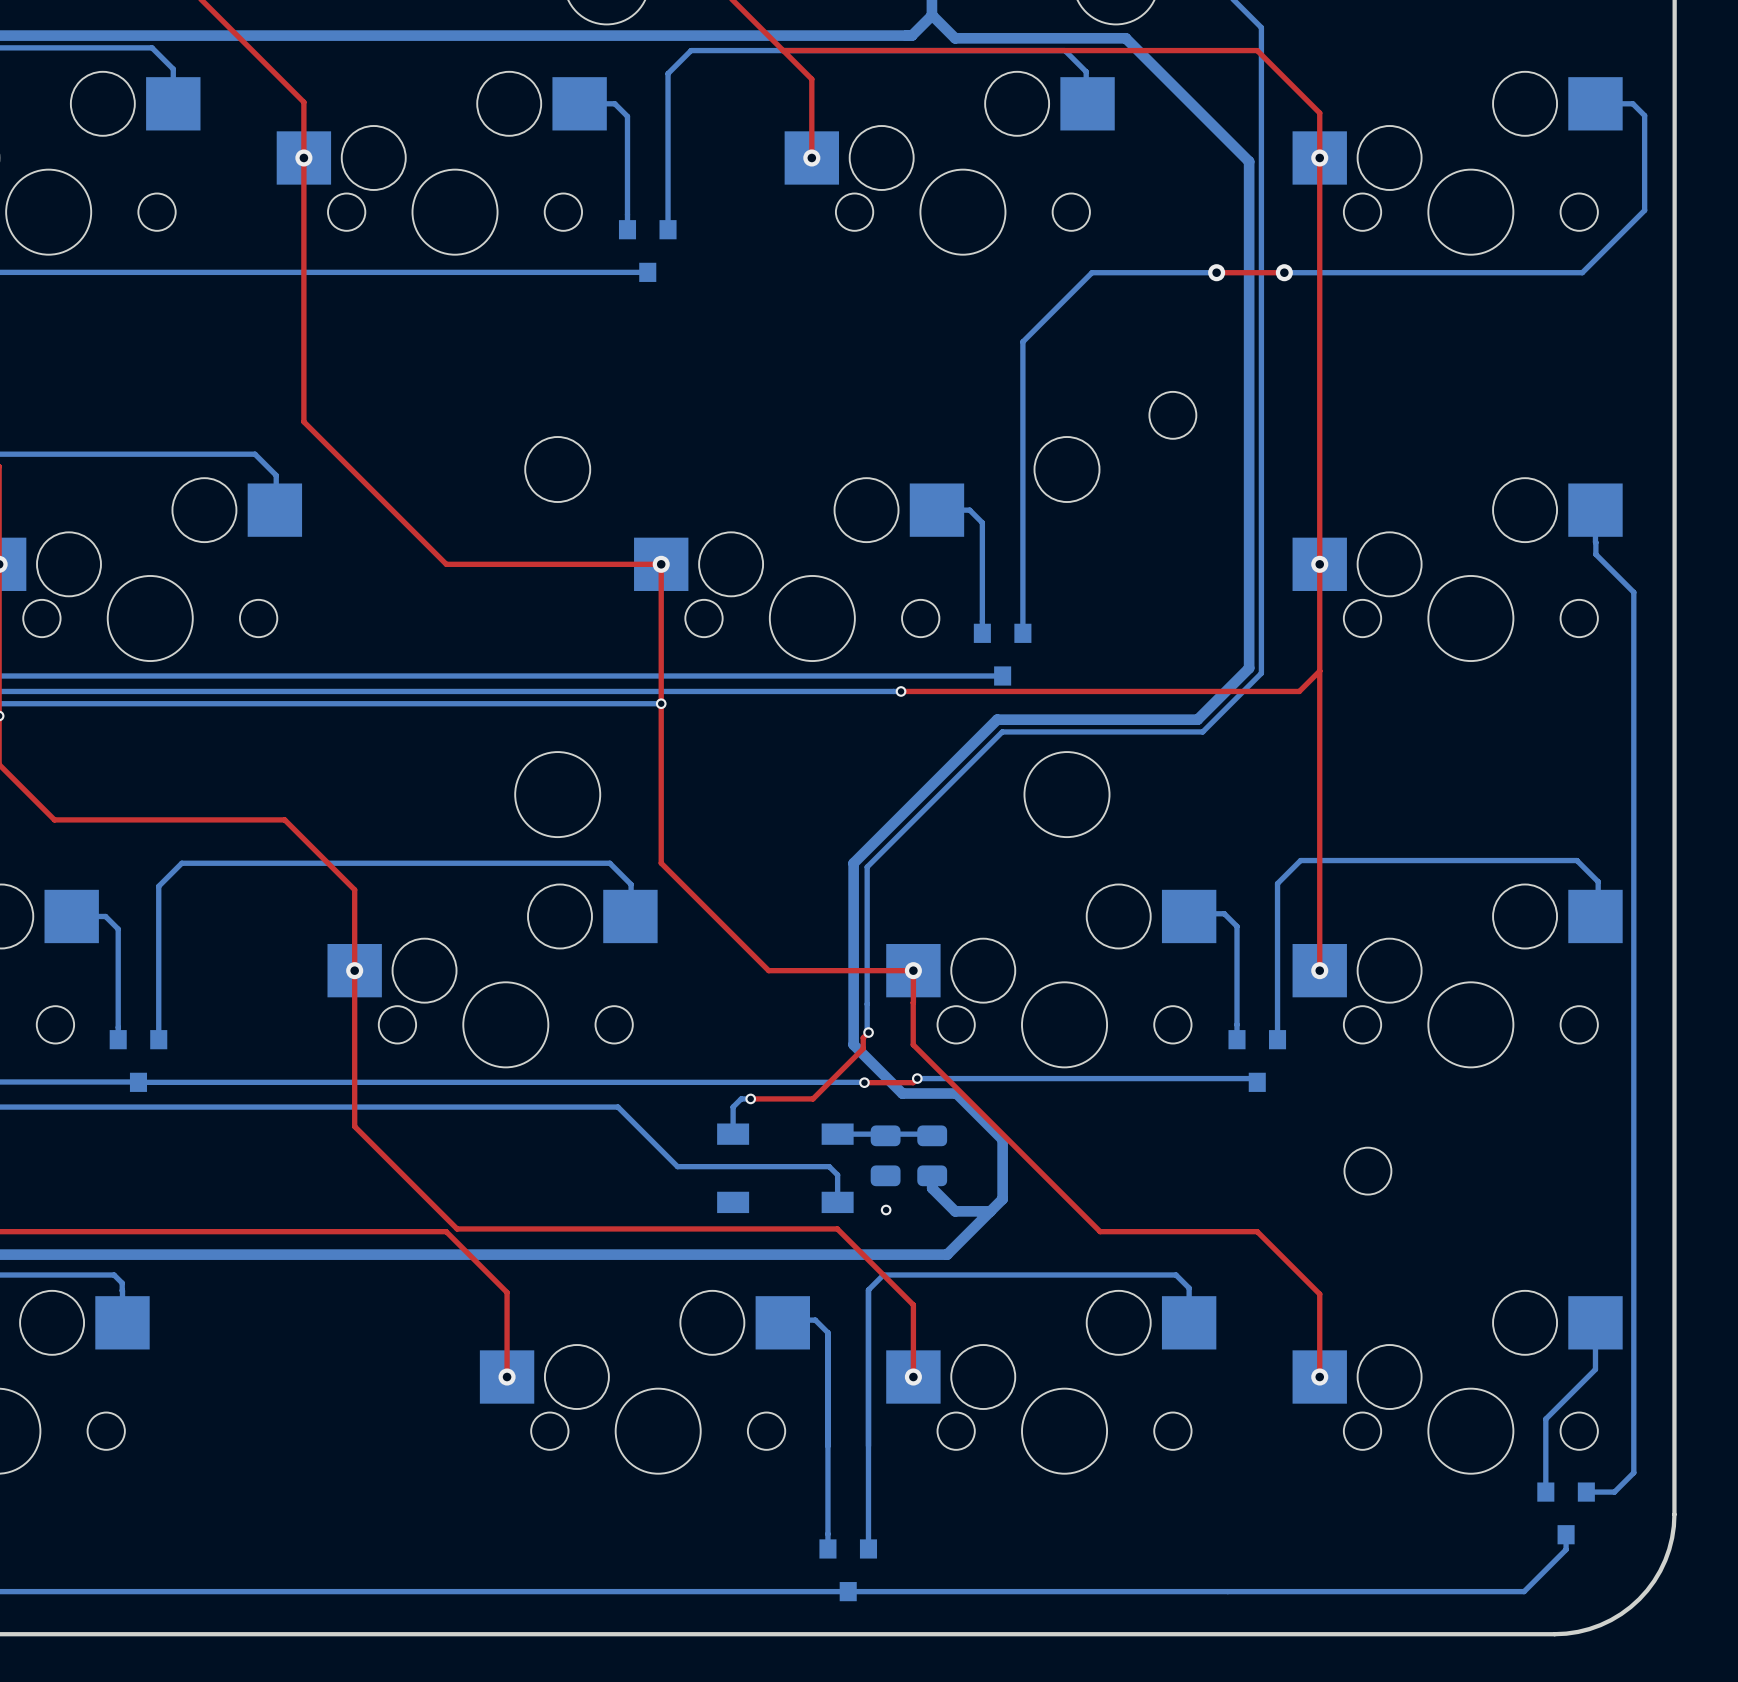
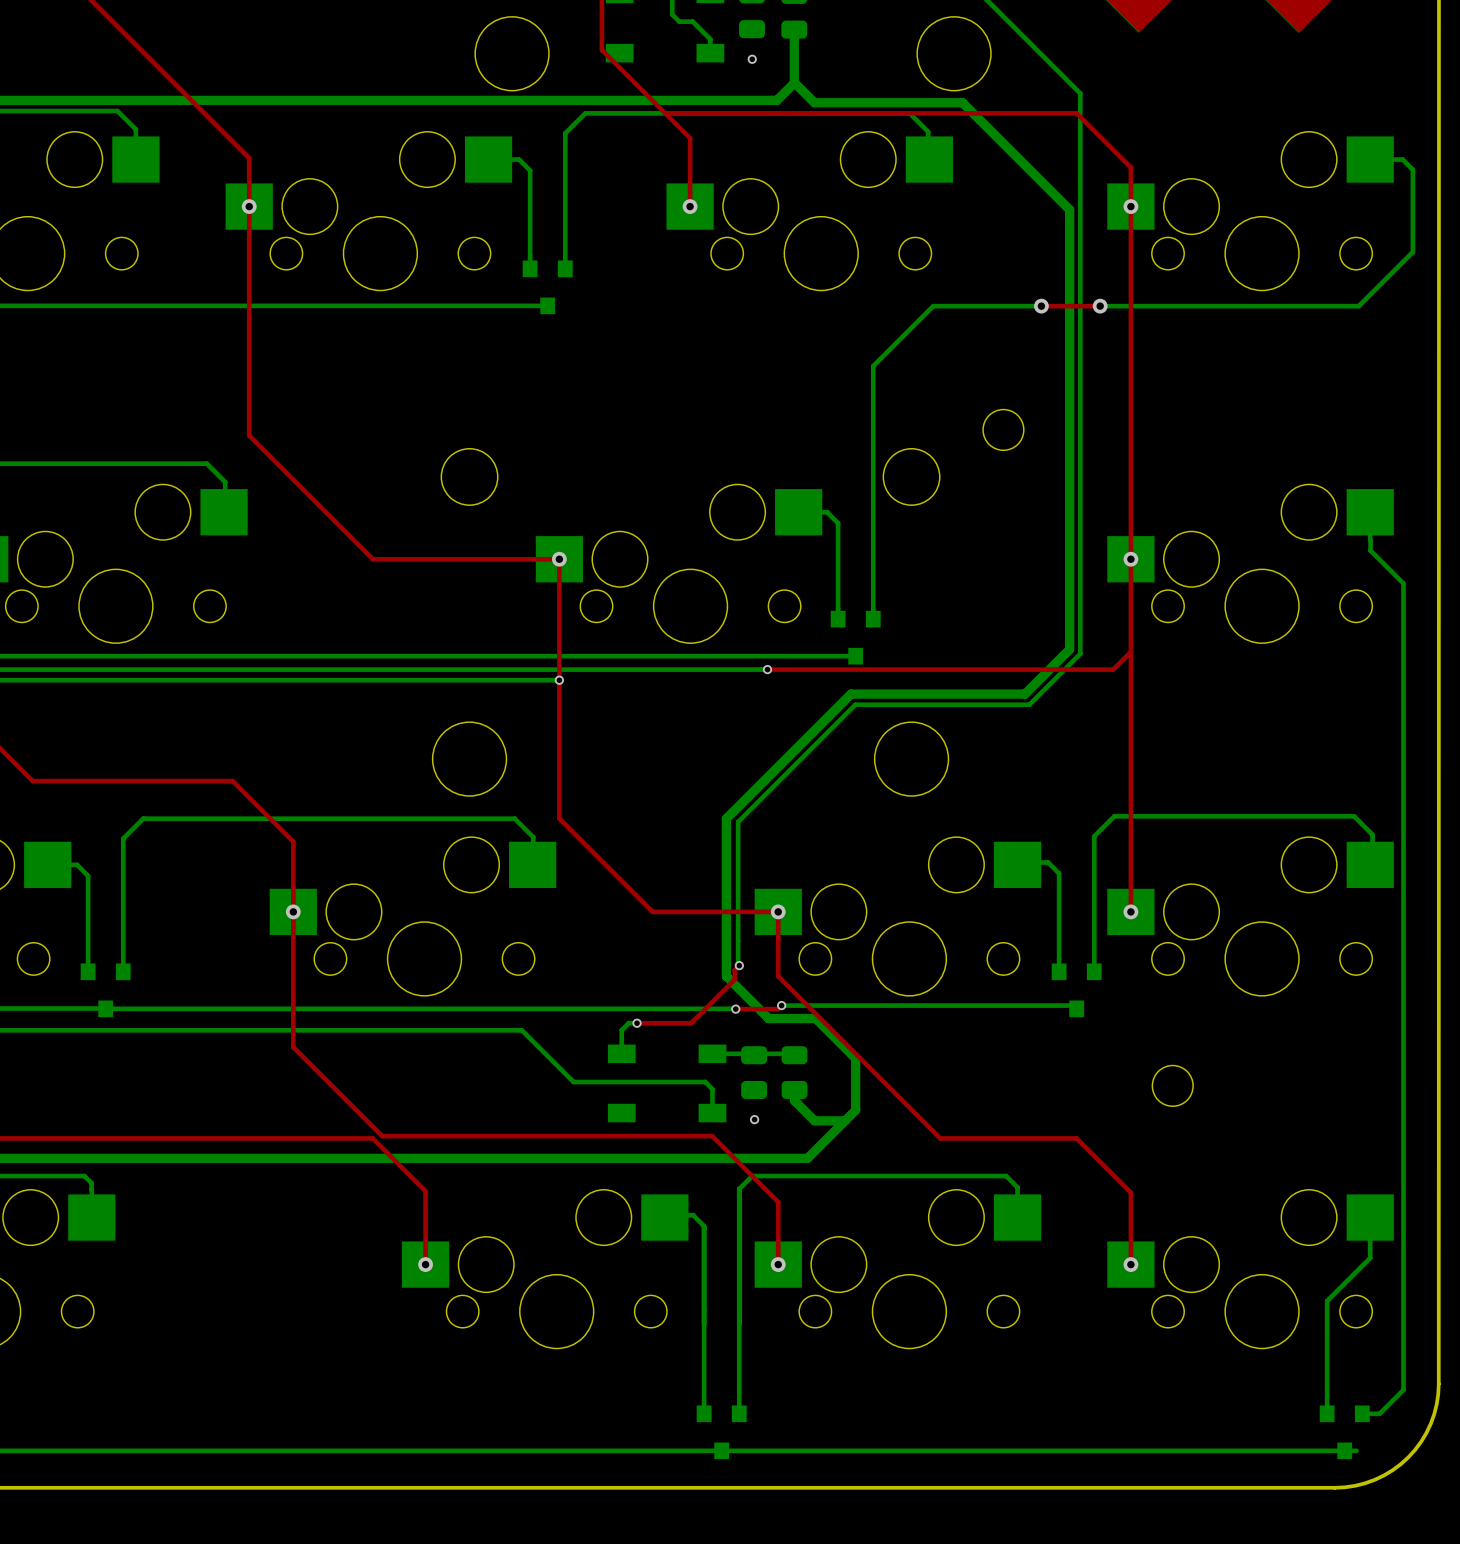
bottom track: (1633, 1472) (1614, 1492) (1586, 1492) -> (1403, 1347) (1403, 1390) (1379, 1413) (1362, 1413)
bottom track: none -> (1327, 1364) (1327, 1413)
part position: (1566, 1513) -> (1344, 1432)
bottom track: (1566, 1534) (1566, 1549) (1524, 1591) -> (1356, 1450) (1308, 1450)

